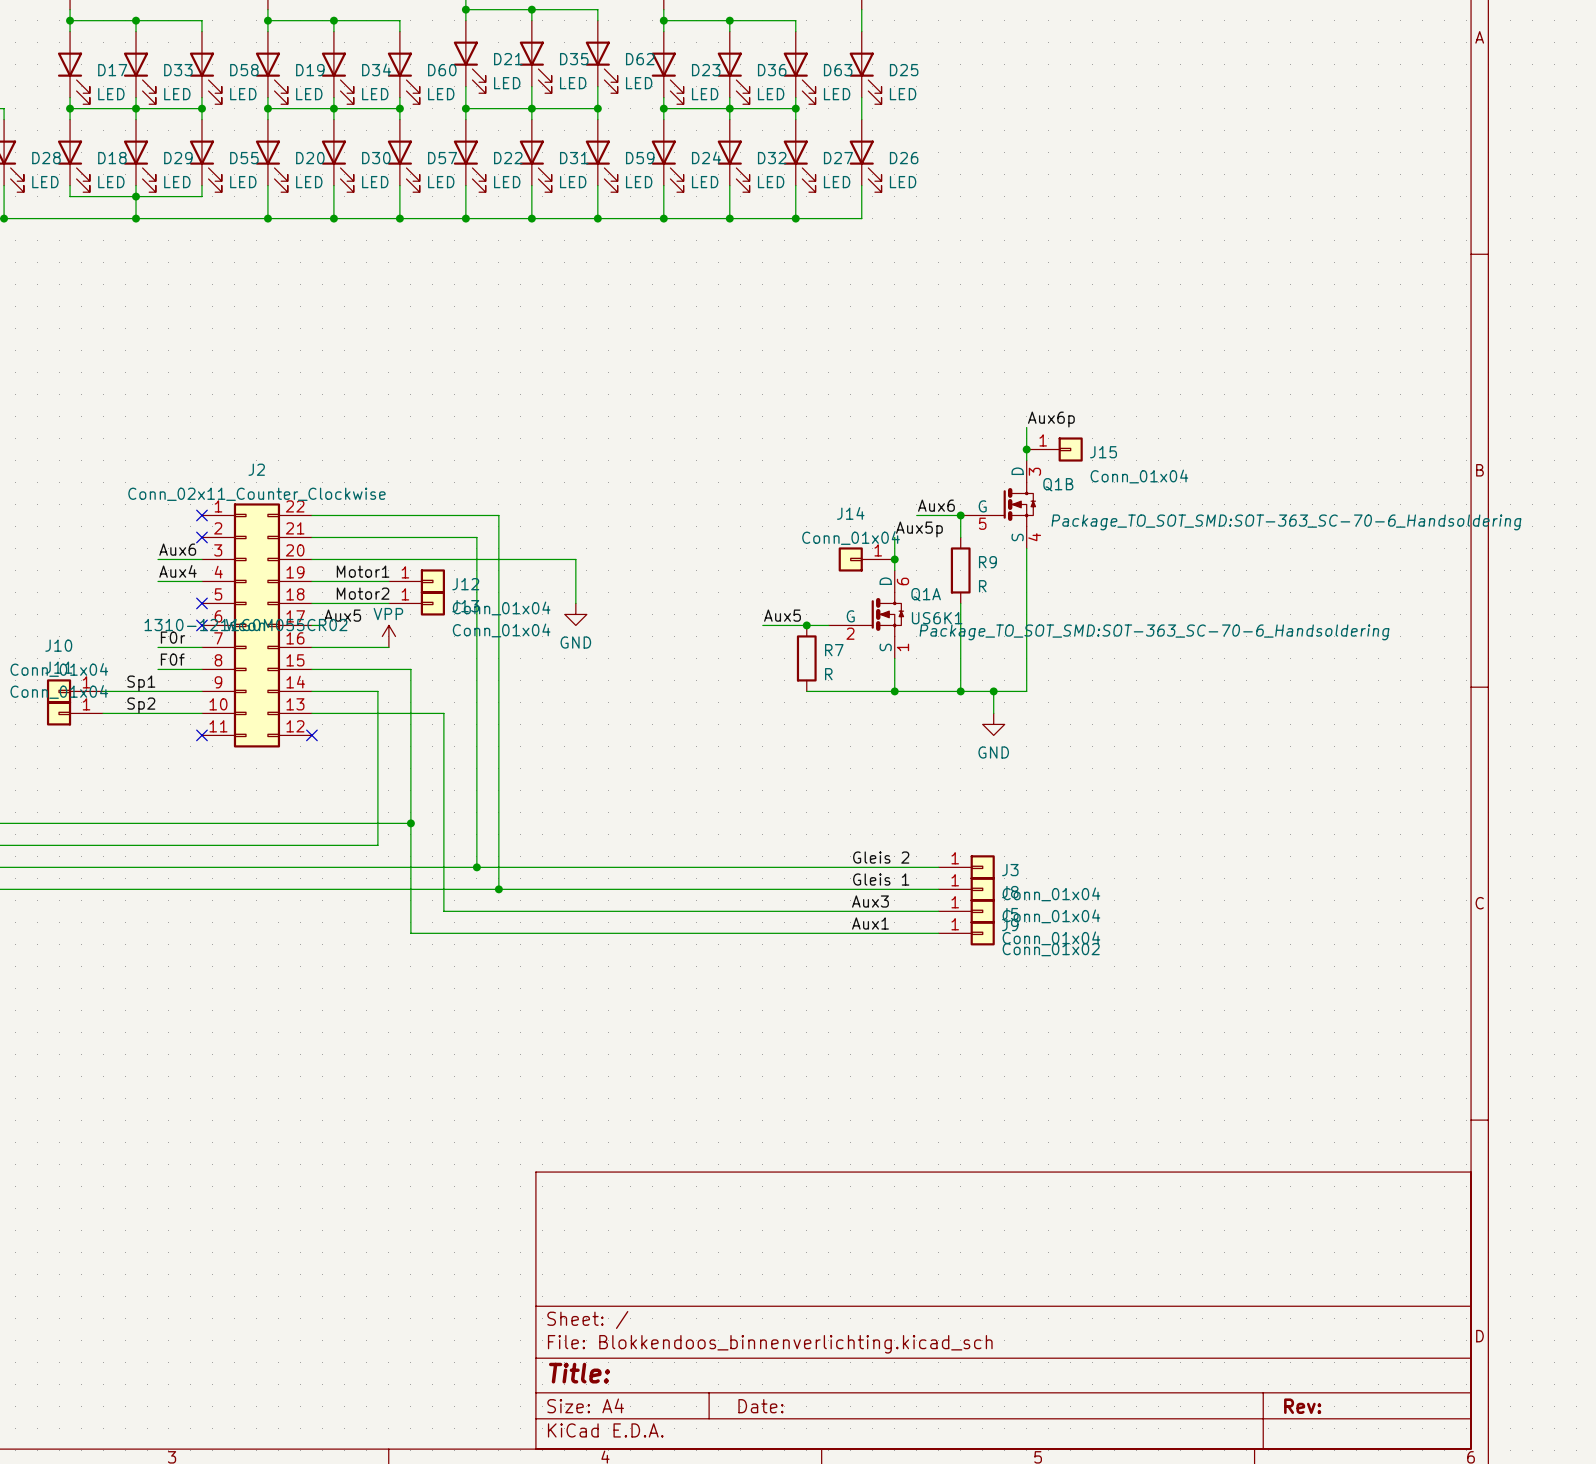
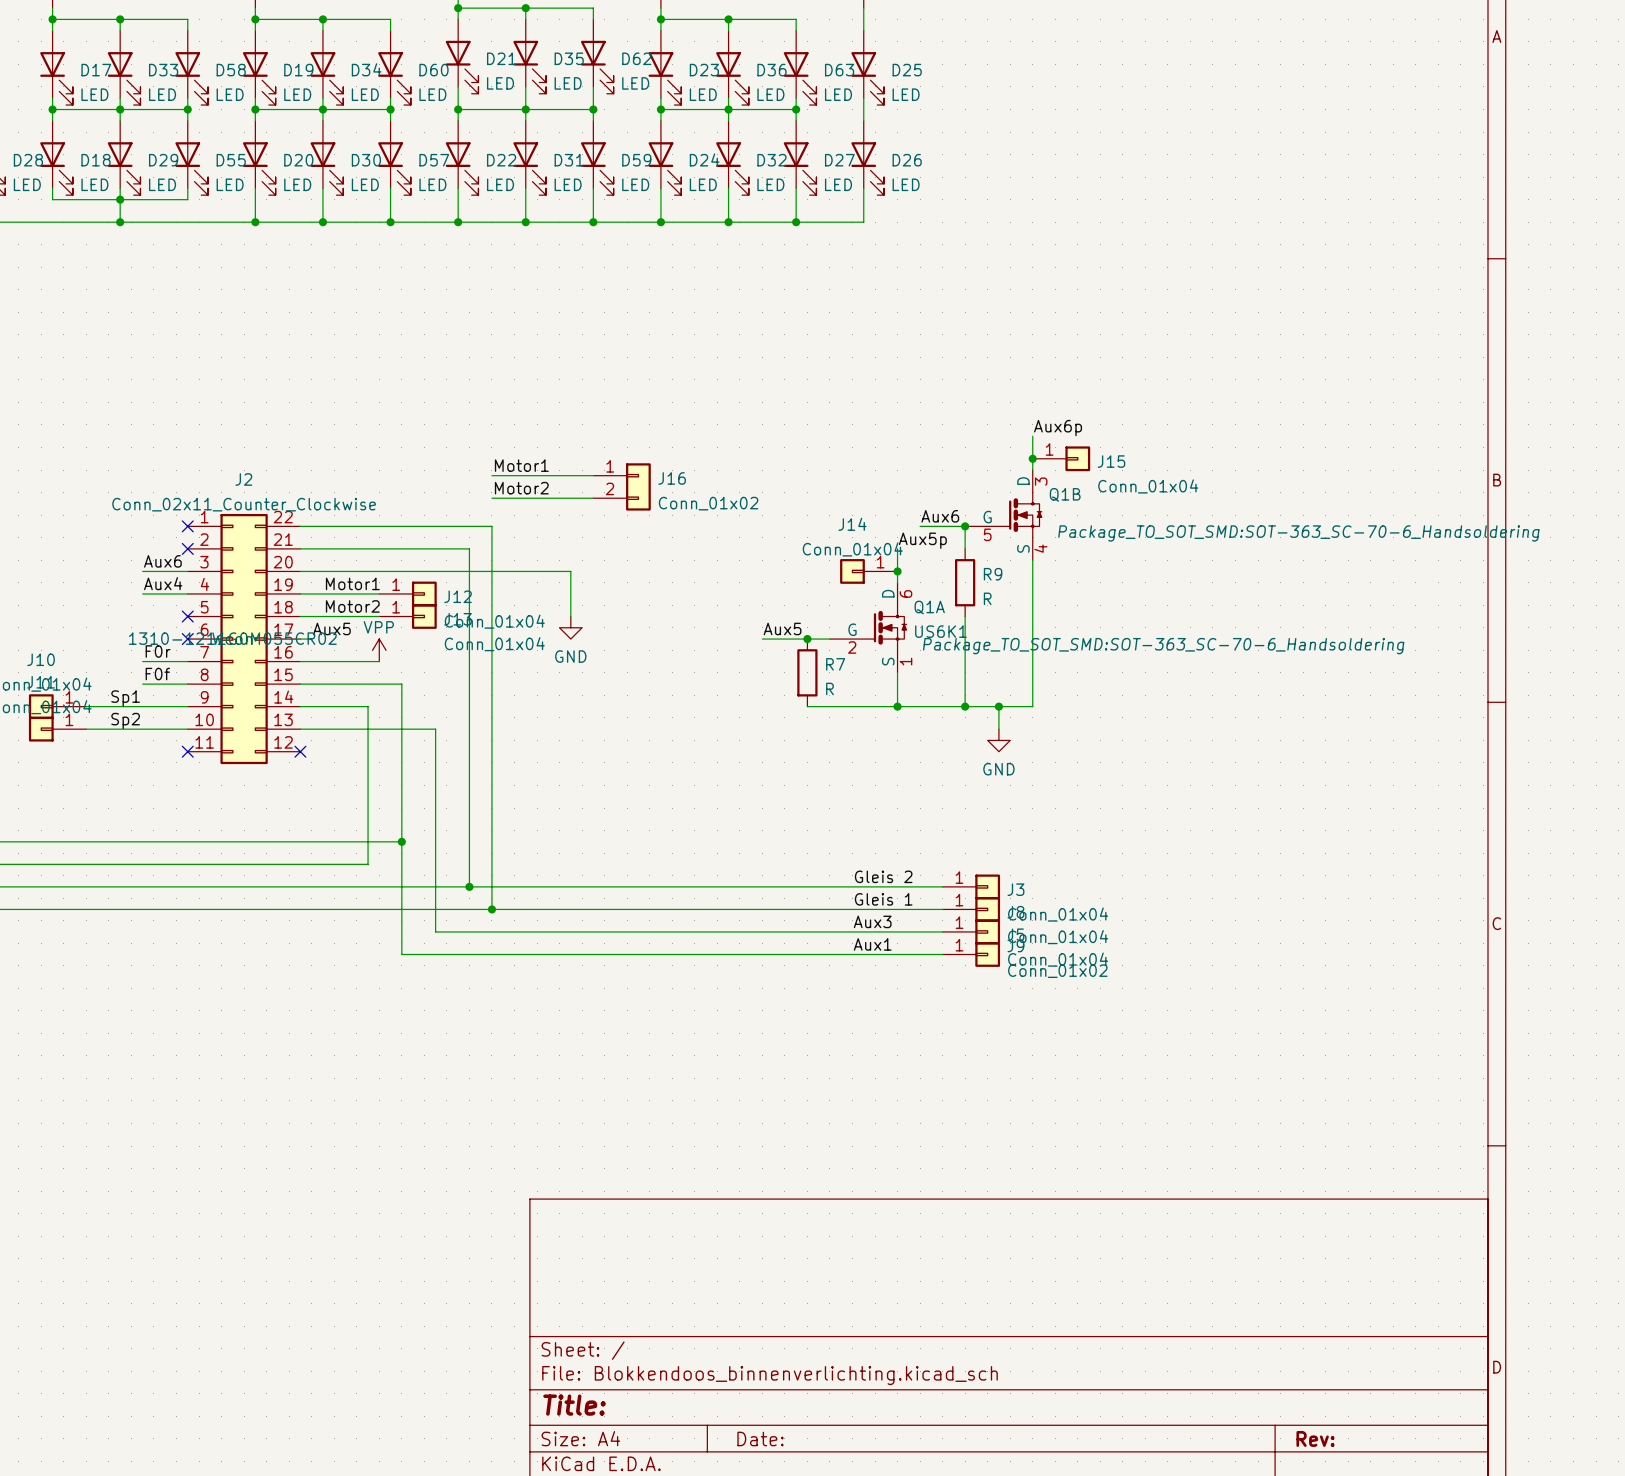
label: none -> Motor1 (521, 465)
wire: none -> (491, 475) (593, 475)
J16: none -> Conn_01x02 (622, 486)
label: none -> Motor2 (521, 488)
wire: none -> (491, 498) (593, 498)

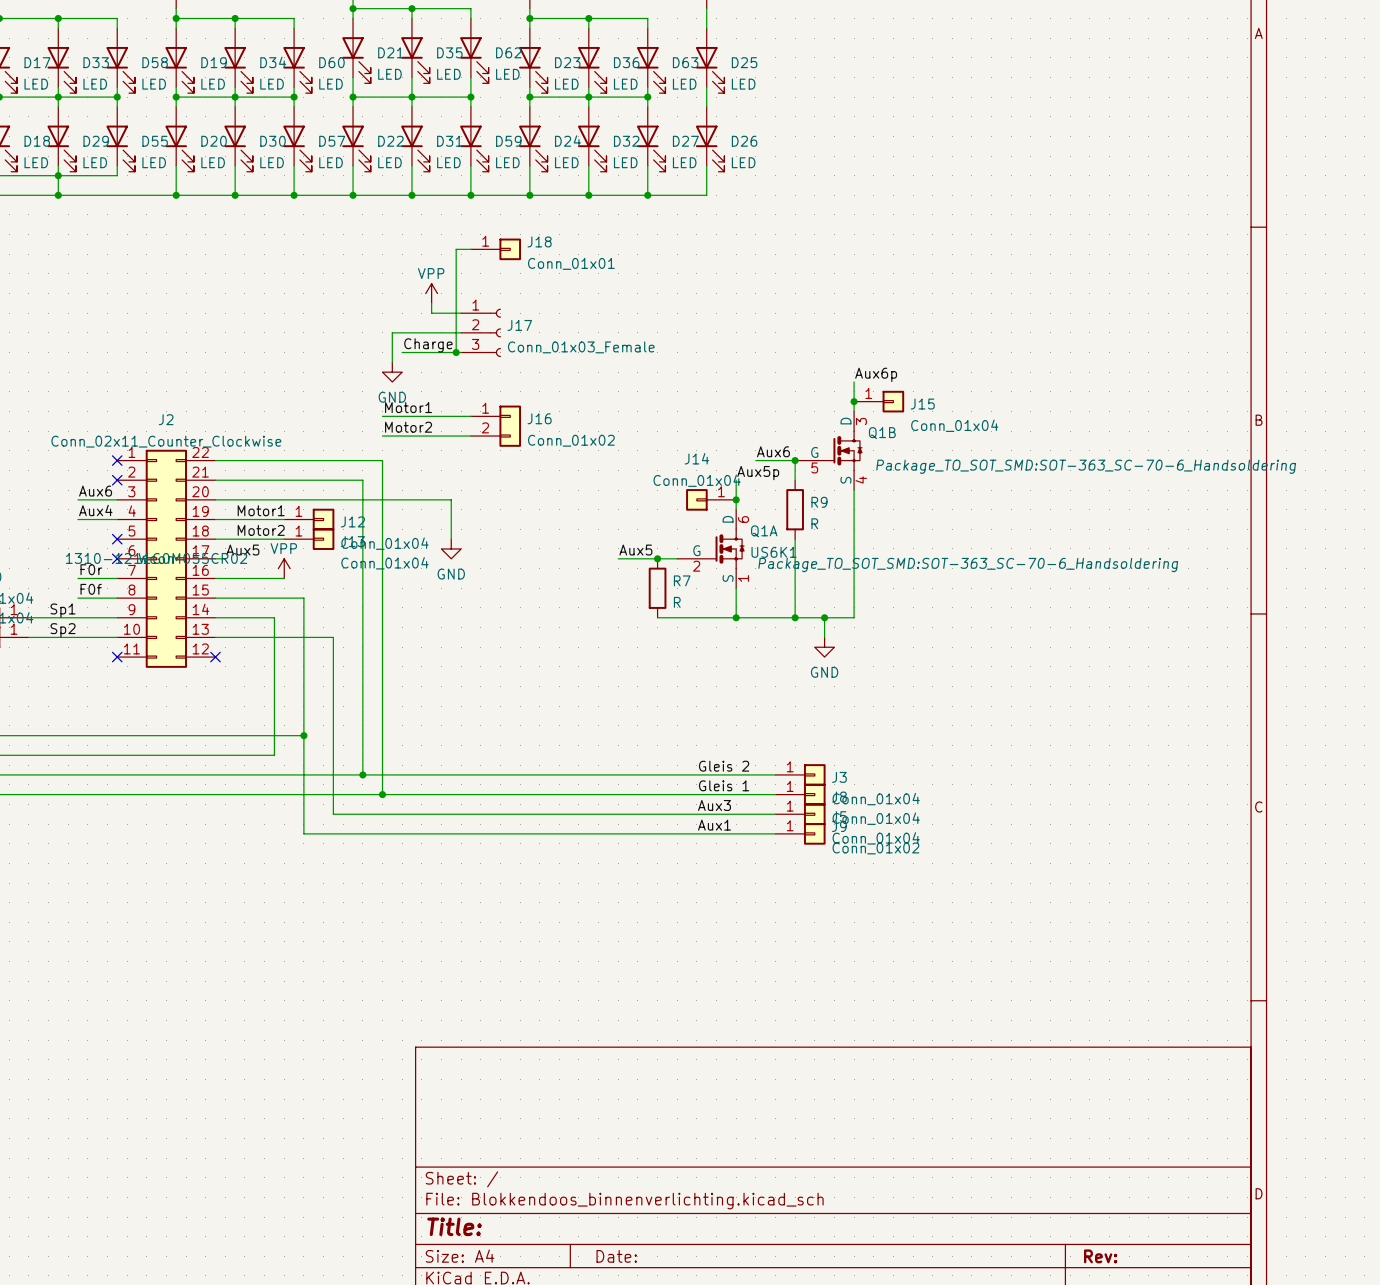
wire: none -> (470, 249) (456, 249) (456, 352)
J18: none -> Conn_01x01 (495, 249)
power symbol: none -> VPP (431, 293)
wire: none -> (431, 303) (431, 313) (461, 313)
wire: none -> (461, 332) (392, 332) (392, 362)
J17: none -> Conn_01x03_Female (481, 332)
label: none -> Charge (428, 345)
wire: none -> (402, 352) (461, 352)
junction: none -> (456, 352)
power symbol: none -> GND (392, 372)

